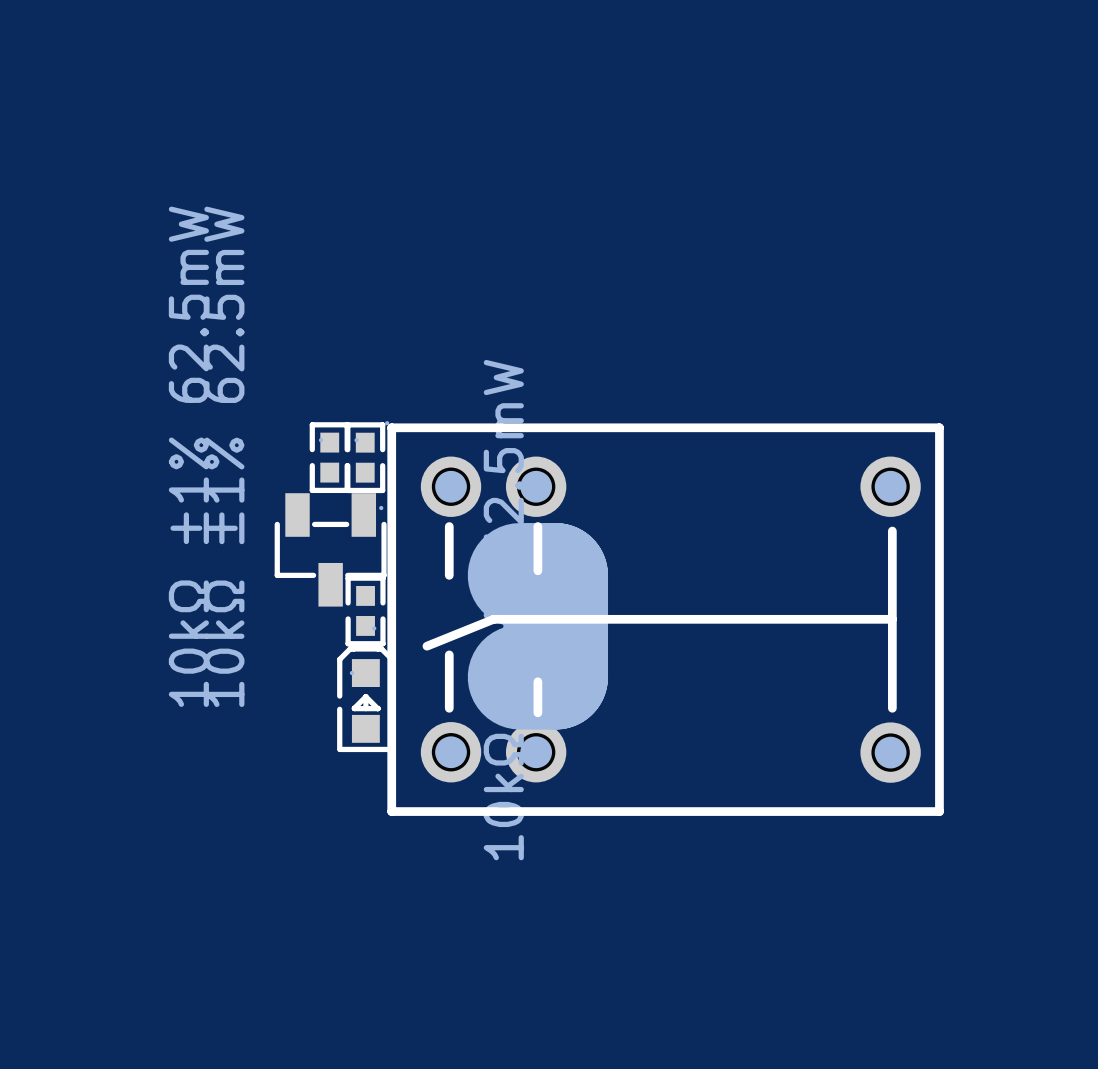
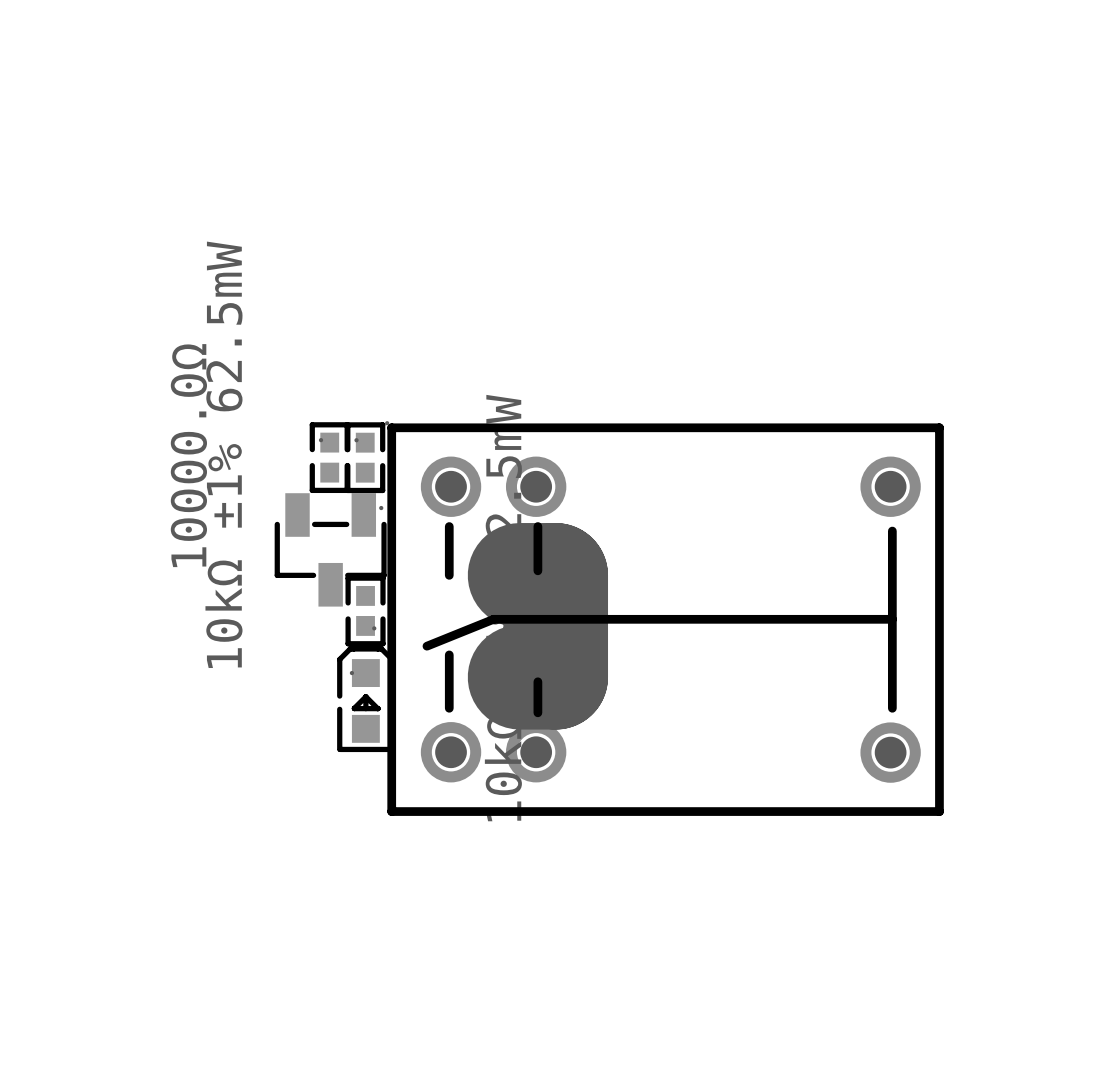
part value: 10kΩ ±1% 62.5mW (188, 456) -> 10000.0Ω (188, 455)

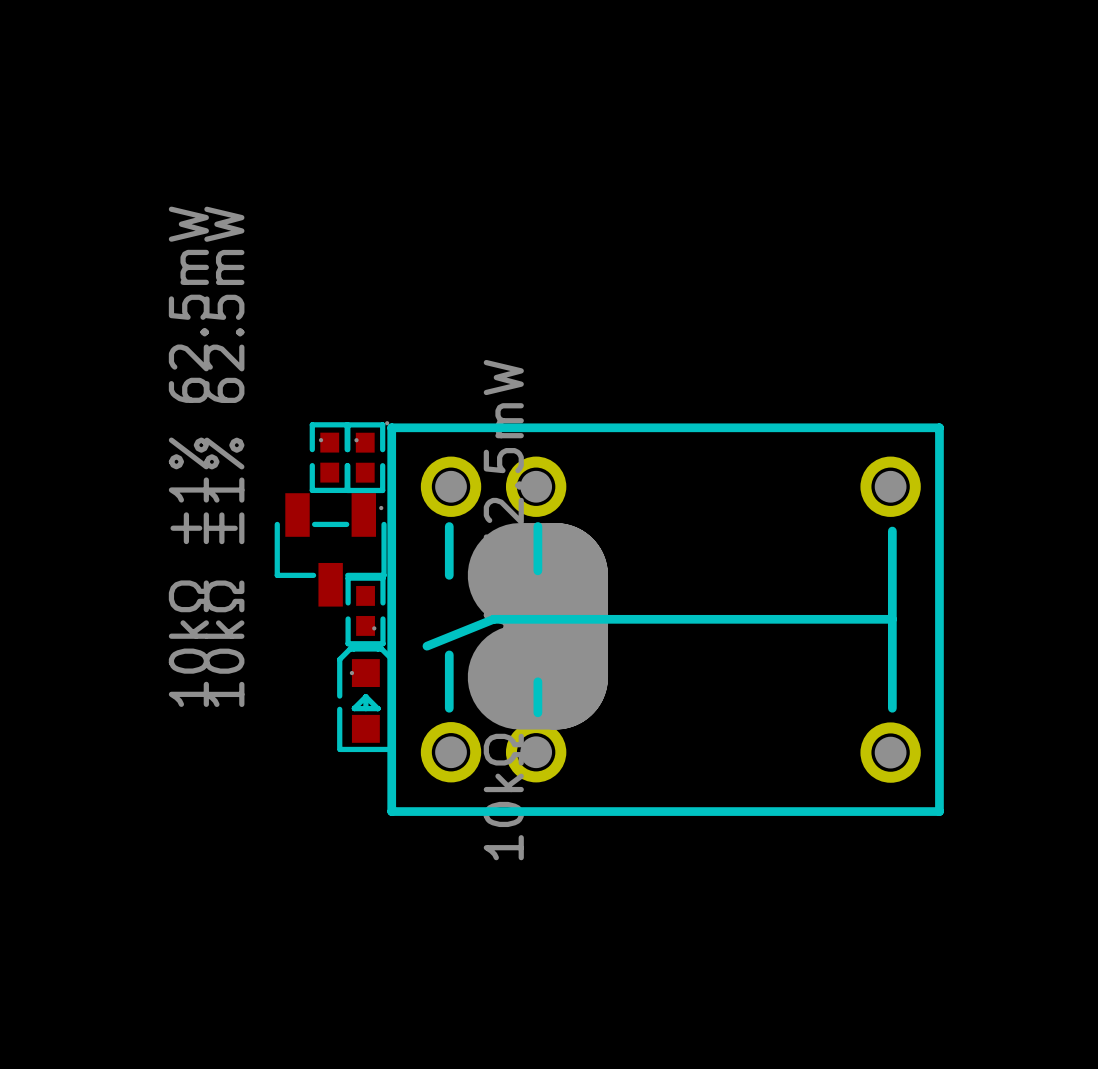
part value: 10000.0Ω (188, 455) -> 10kΩ ±1% 62.5mW (188, 456)

